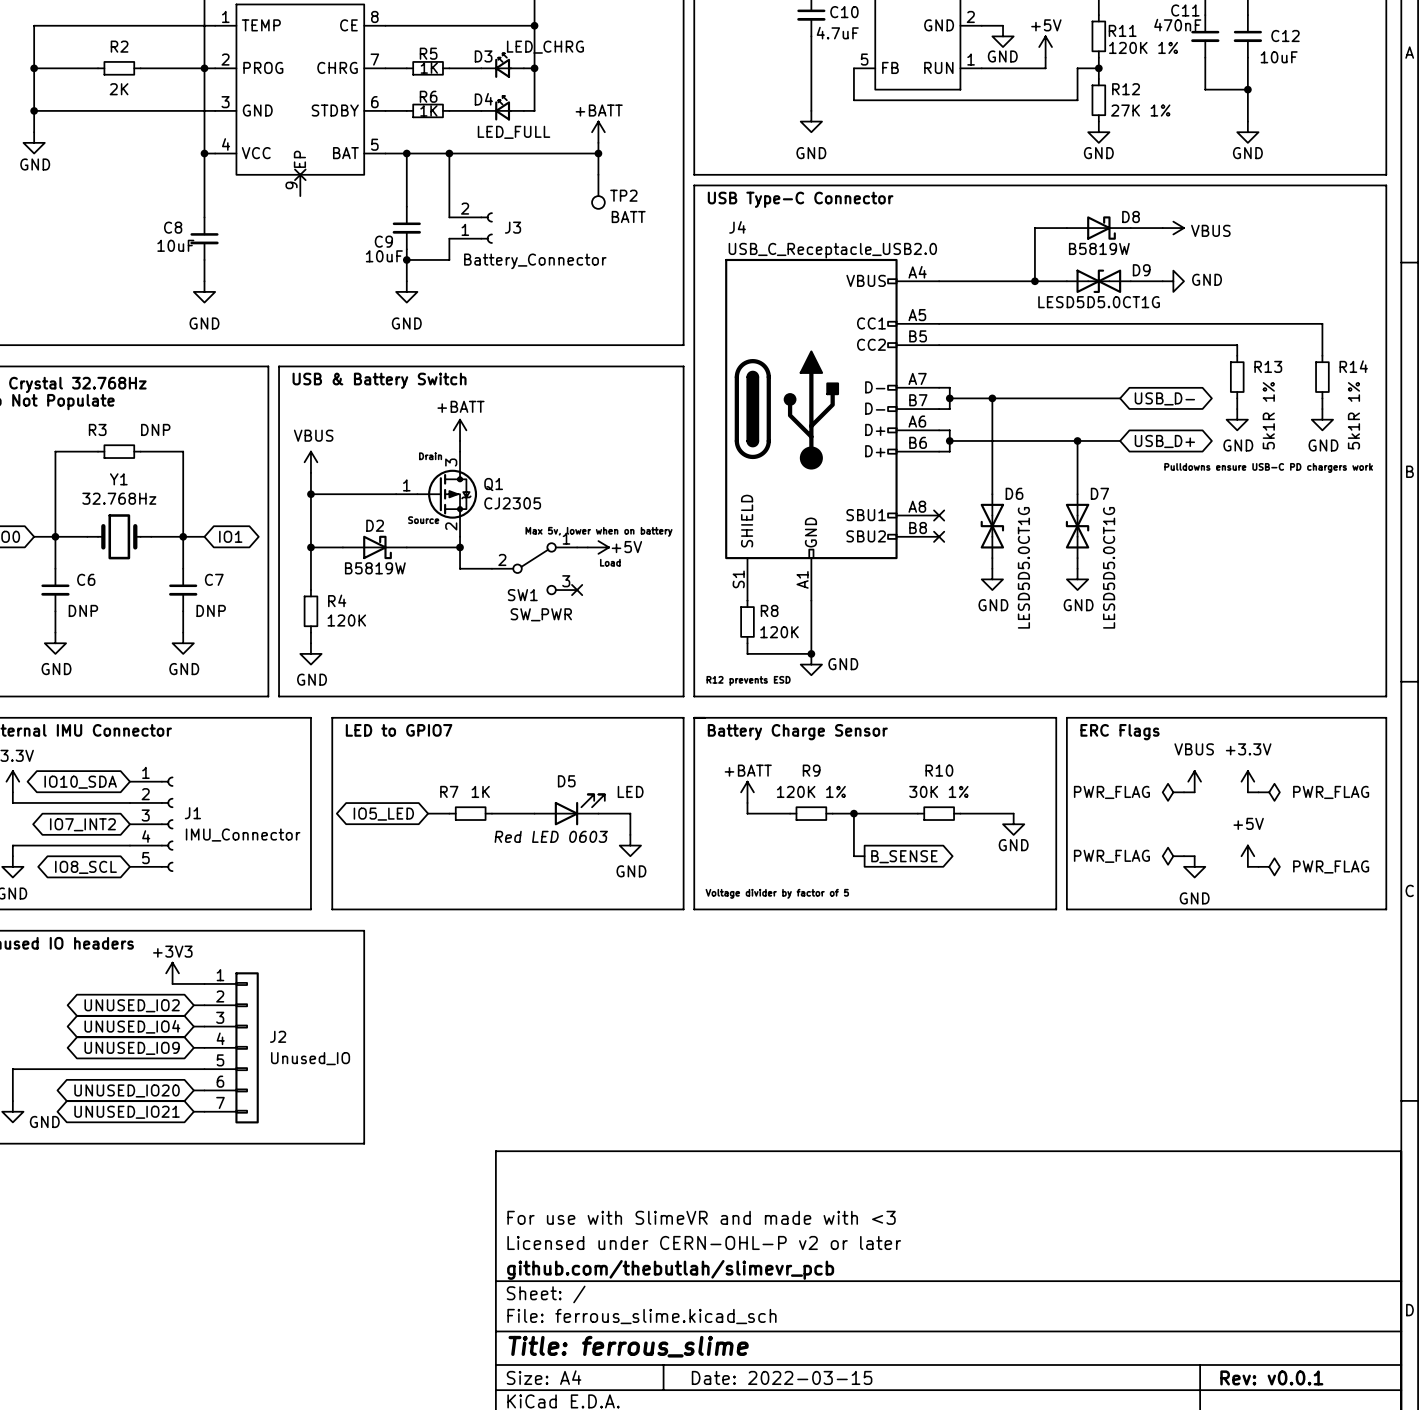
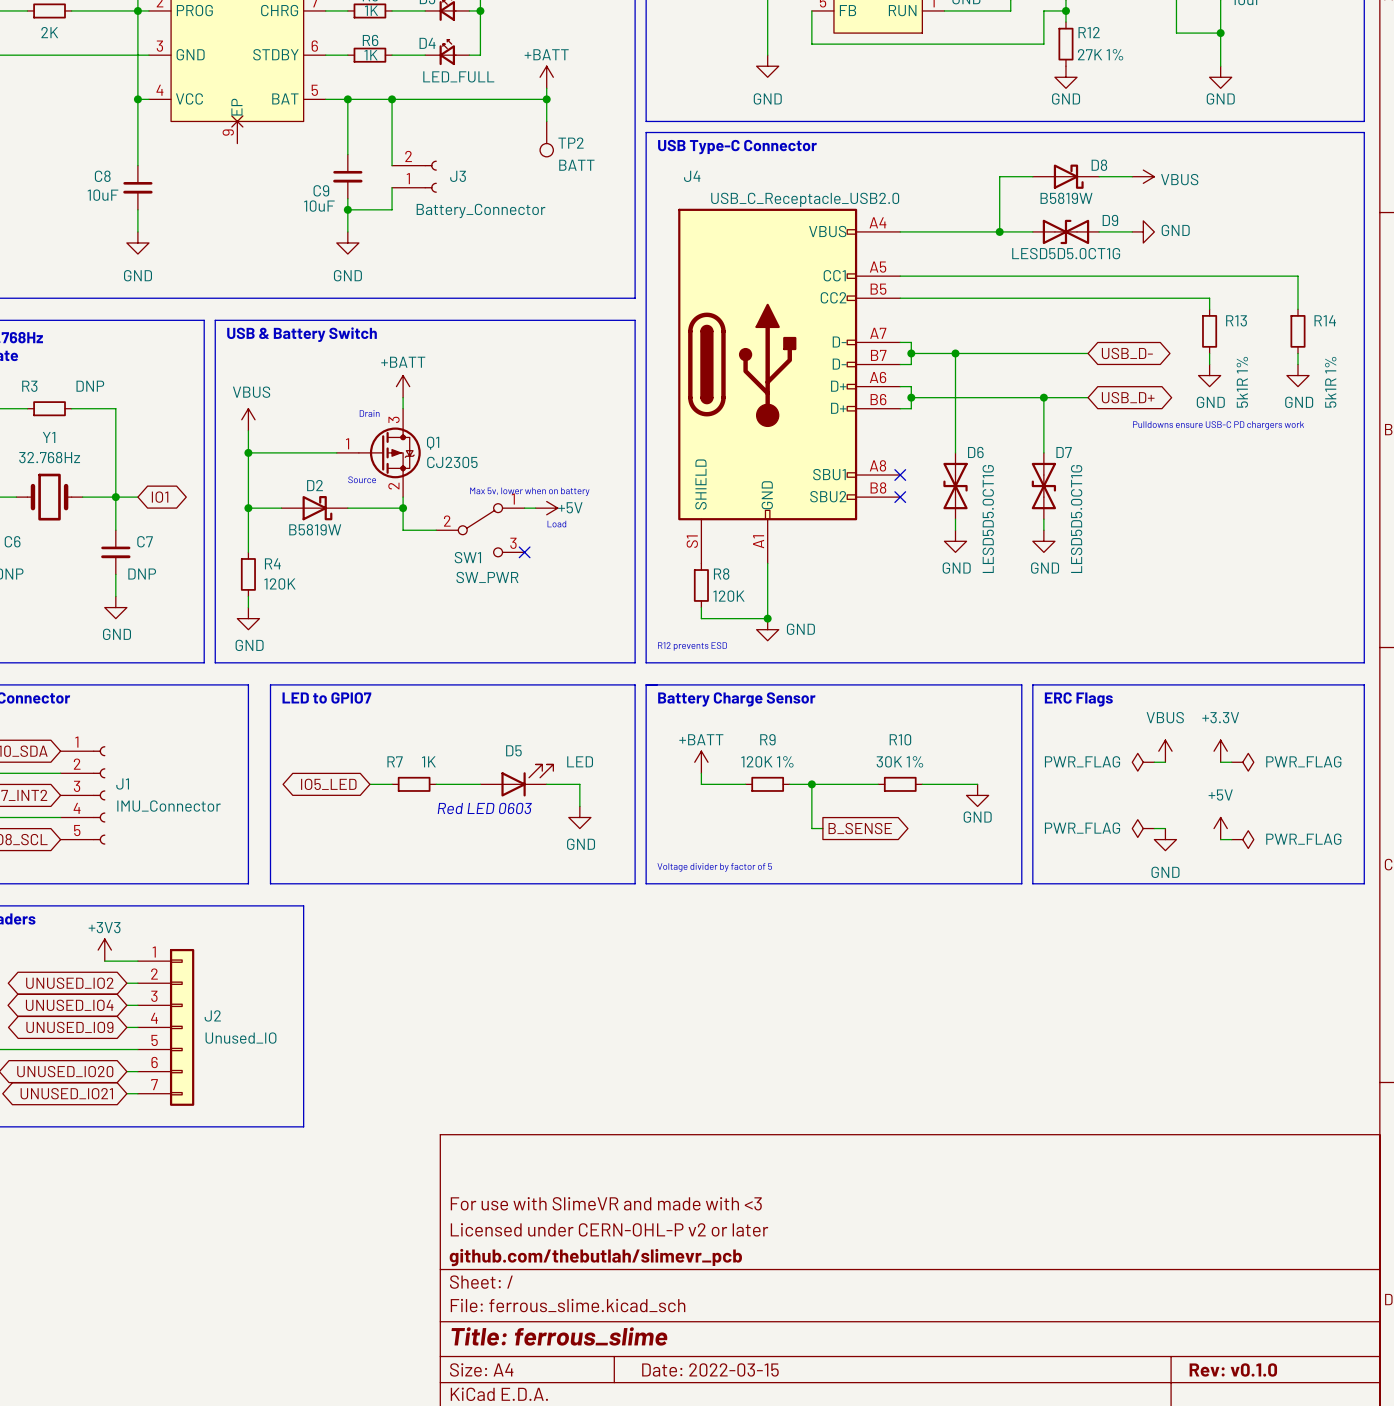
title block: Rev: v0.0.1 (1271, 1377) -> Rev: v0.1.0 (1233, 1369)

